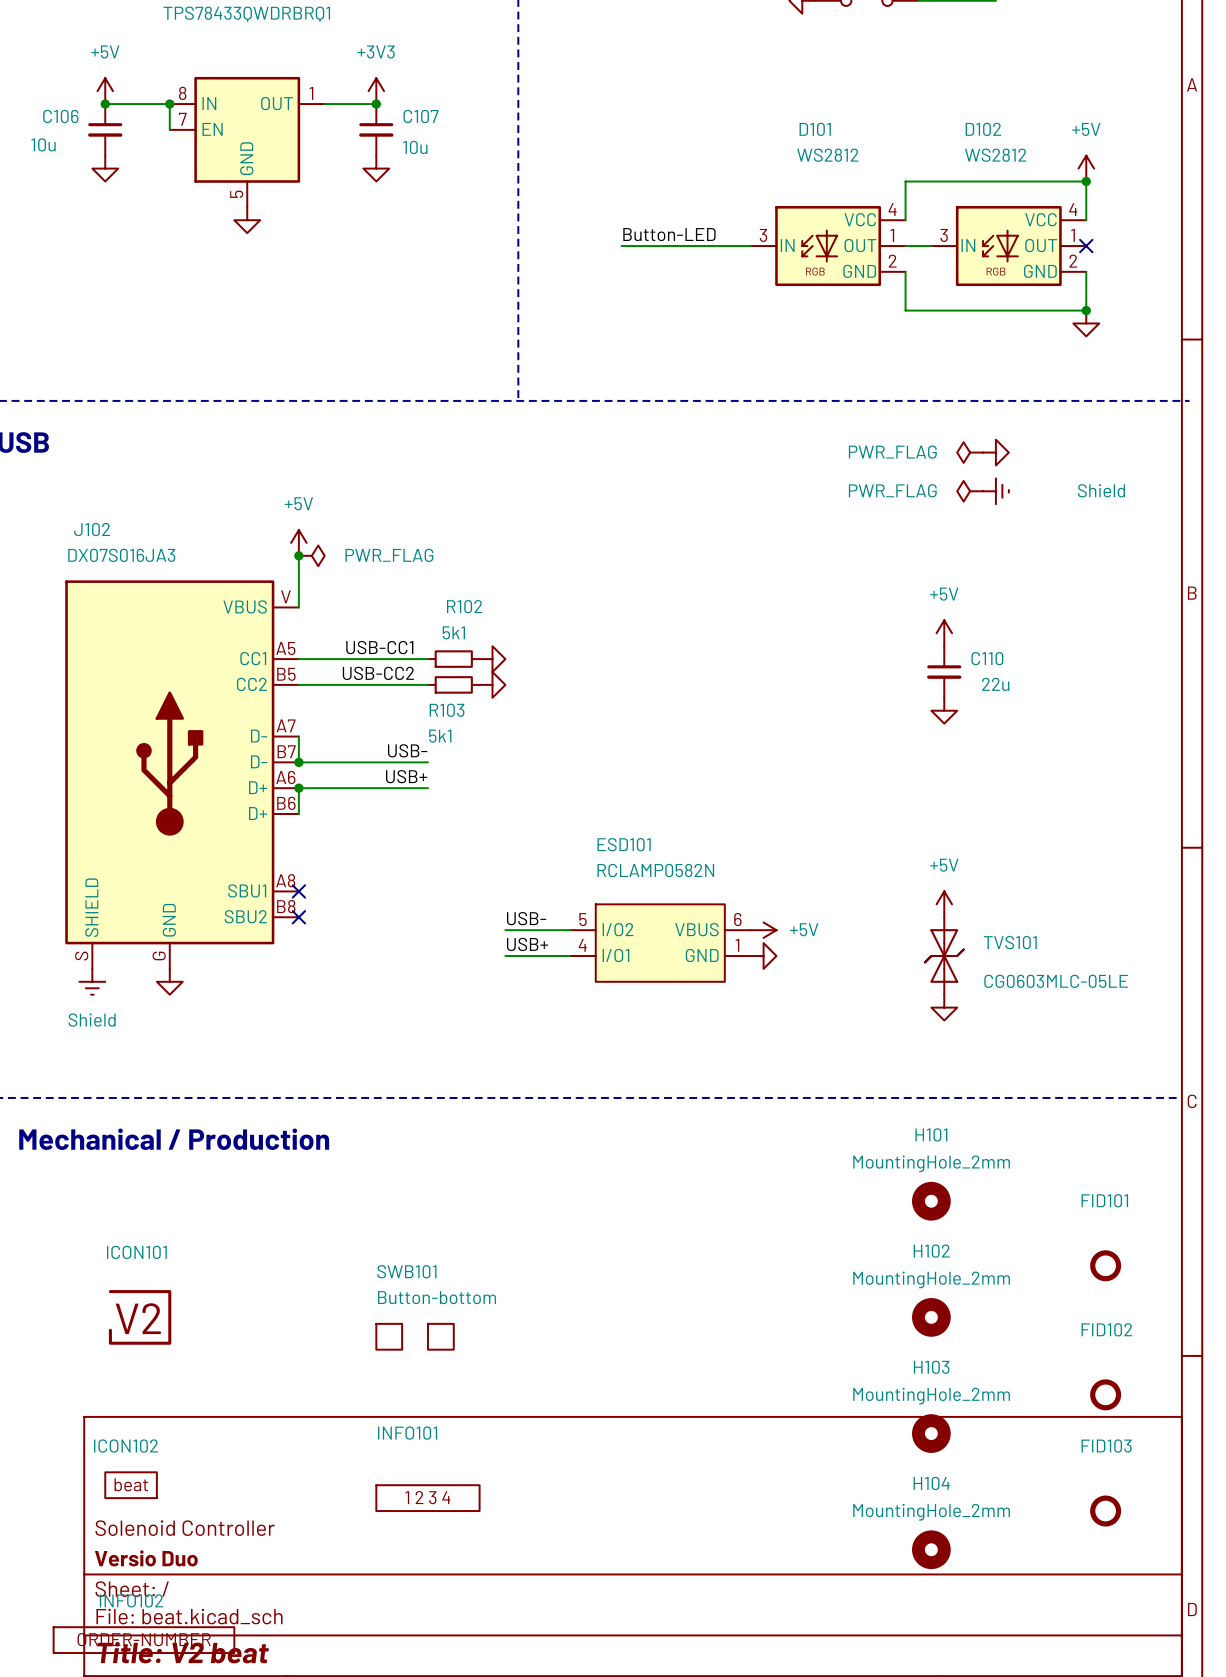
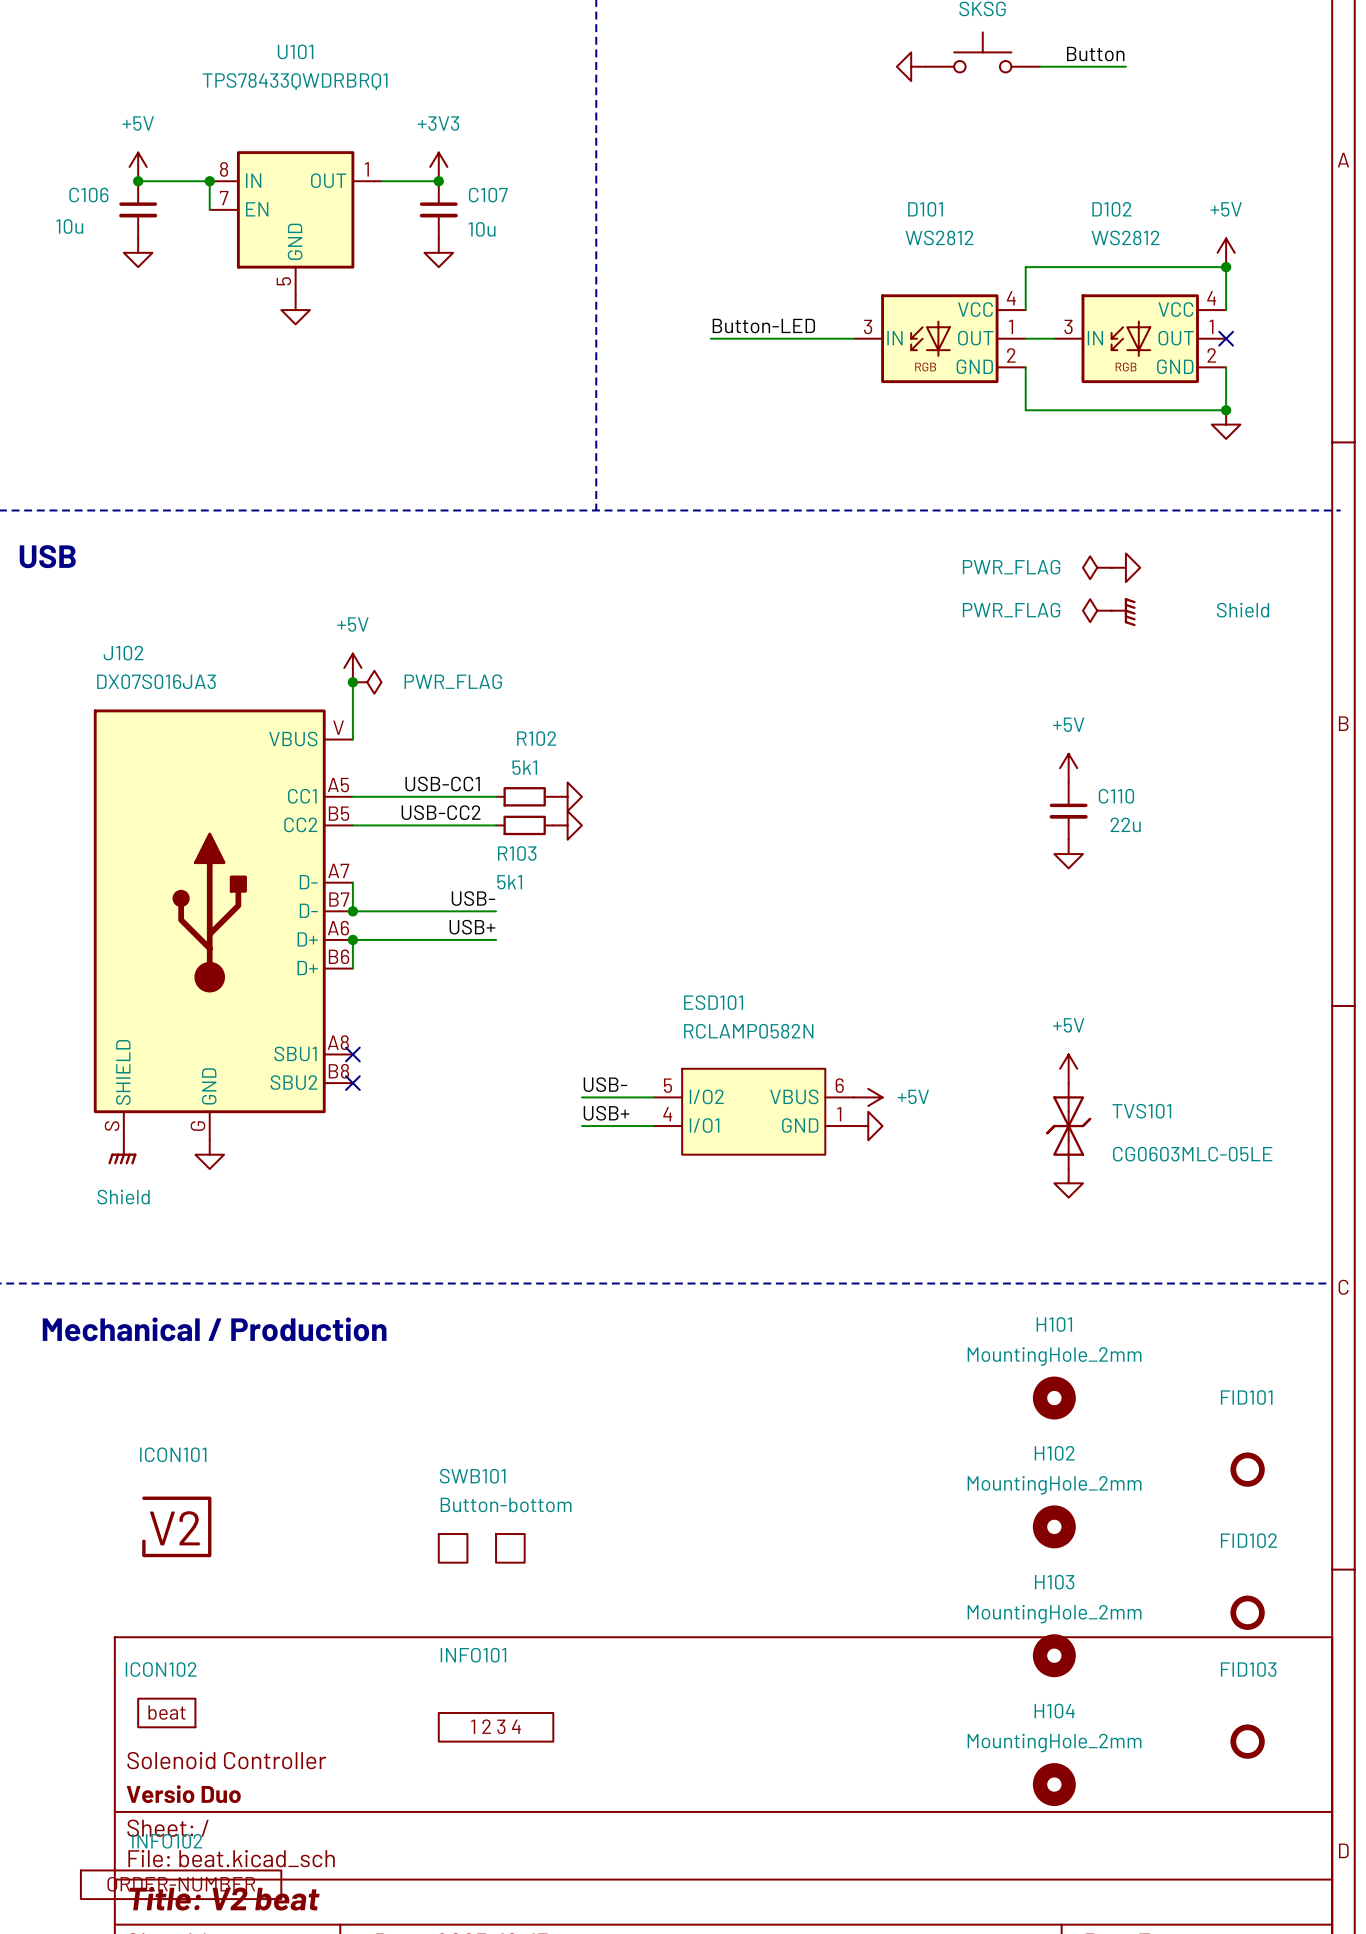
power symbol shape: [983, 478, 1009, 505] -> [1111, 598, 1136, 627]
power symbol shape: [79, 968, 106, 995] -> [108, 1140, 137, 1165]

